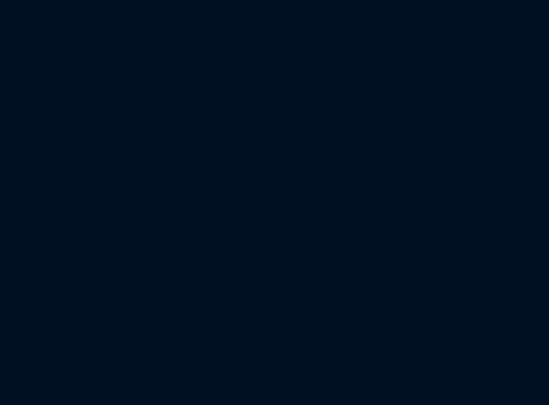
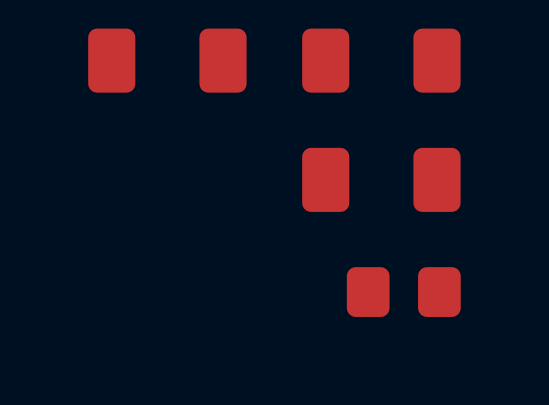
part: none -> (167, 60)
part: none -> (381, 60)
part: none -> (381, 179)
part: none -> (403, 292)

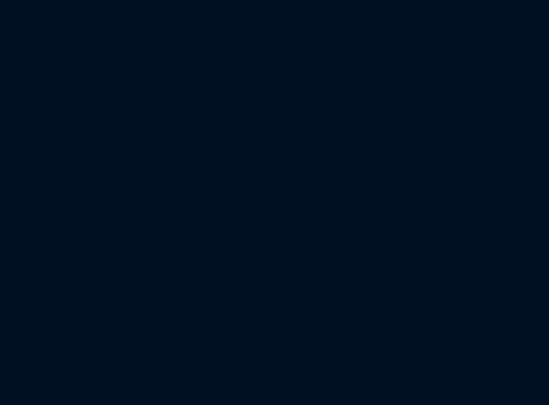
part: (167, 60) -> none
part: (381, 60) -> none
part: (381, 179) -> none
part: (403, 292) -> none

